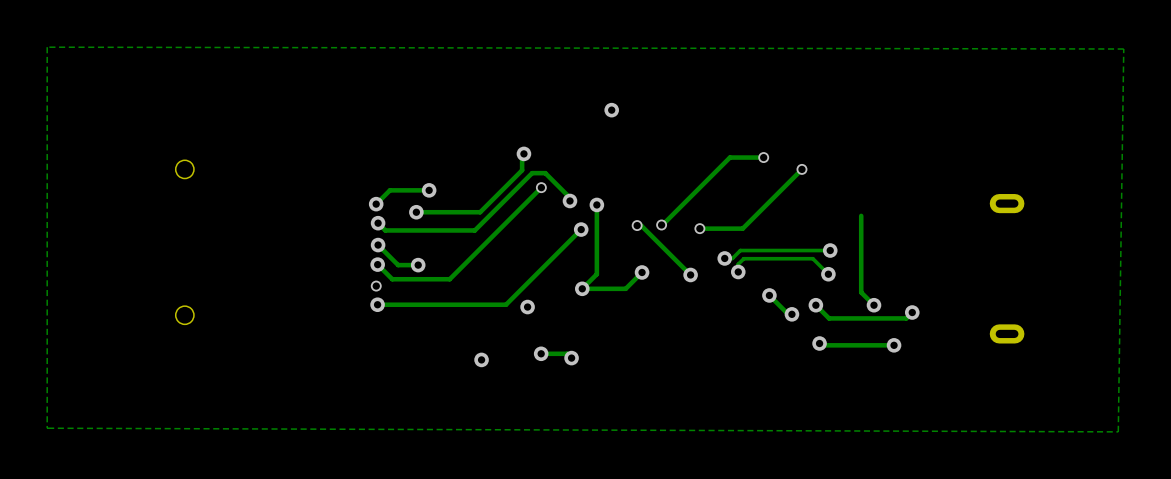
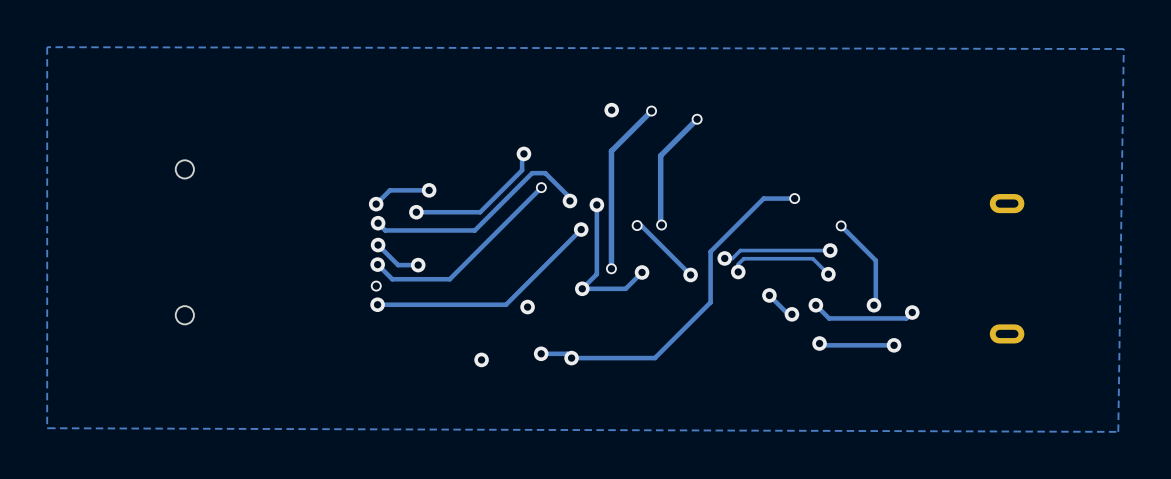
track: none -> (651, 111) (611, 151) (611, 268)
via: none -> (651, 111)
track: none -> (697, 119) (660, 155) (660, 225)
via: none -> (697, 119)
track: (763, 157) (729, 157) (661, 225) -> none
via: (763, 157) -> none
track: (801, 169) (742, 228) (699, 228) -> none
via: (801, 169) -> none
track: none -> (794, 198) (763, 198) (710, 251) (710, 302) (654, 358) (571, 358)
via: none -> (794, 198)
track: (861, 215) (861, 292) (873, 305) -> none
track: none -> (841, 225) (875, 260) (875, 305)
via: none -> (841, 225)
via: (699, 228) -> none
via: none -> (611, 268)

